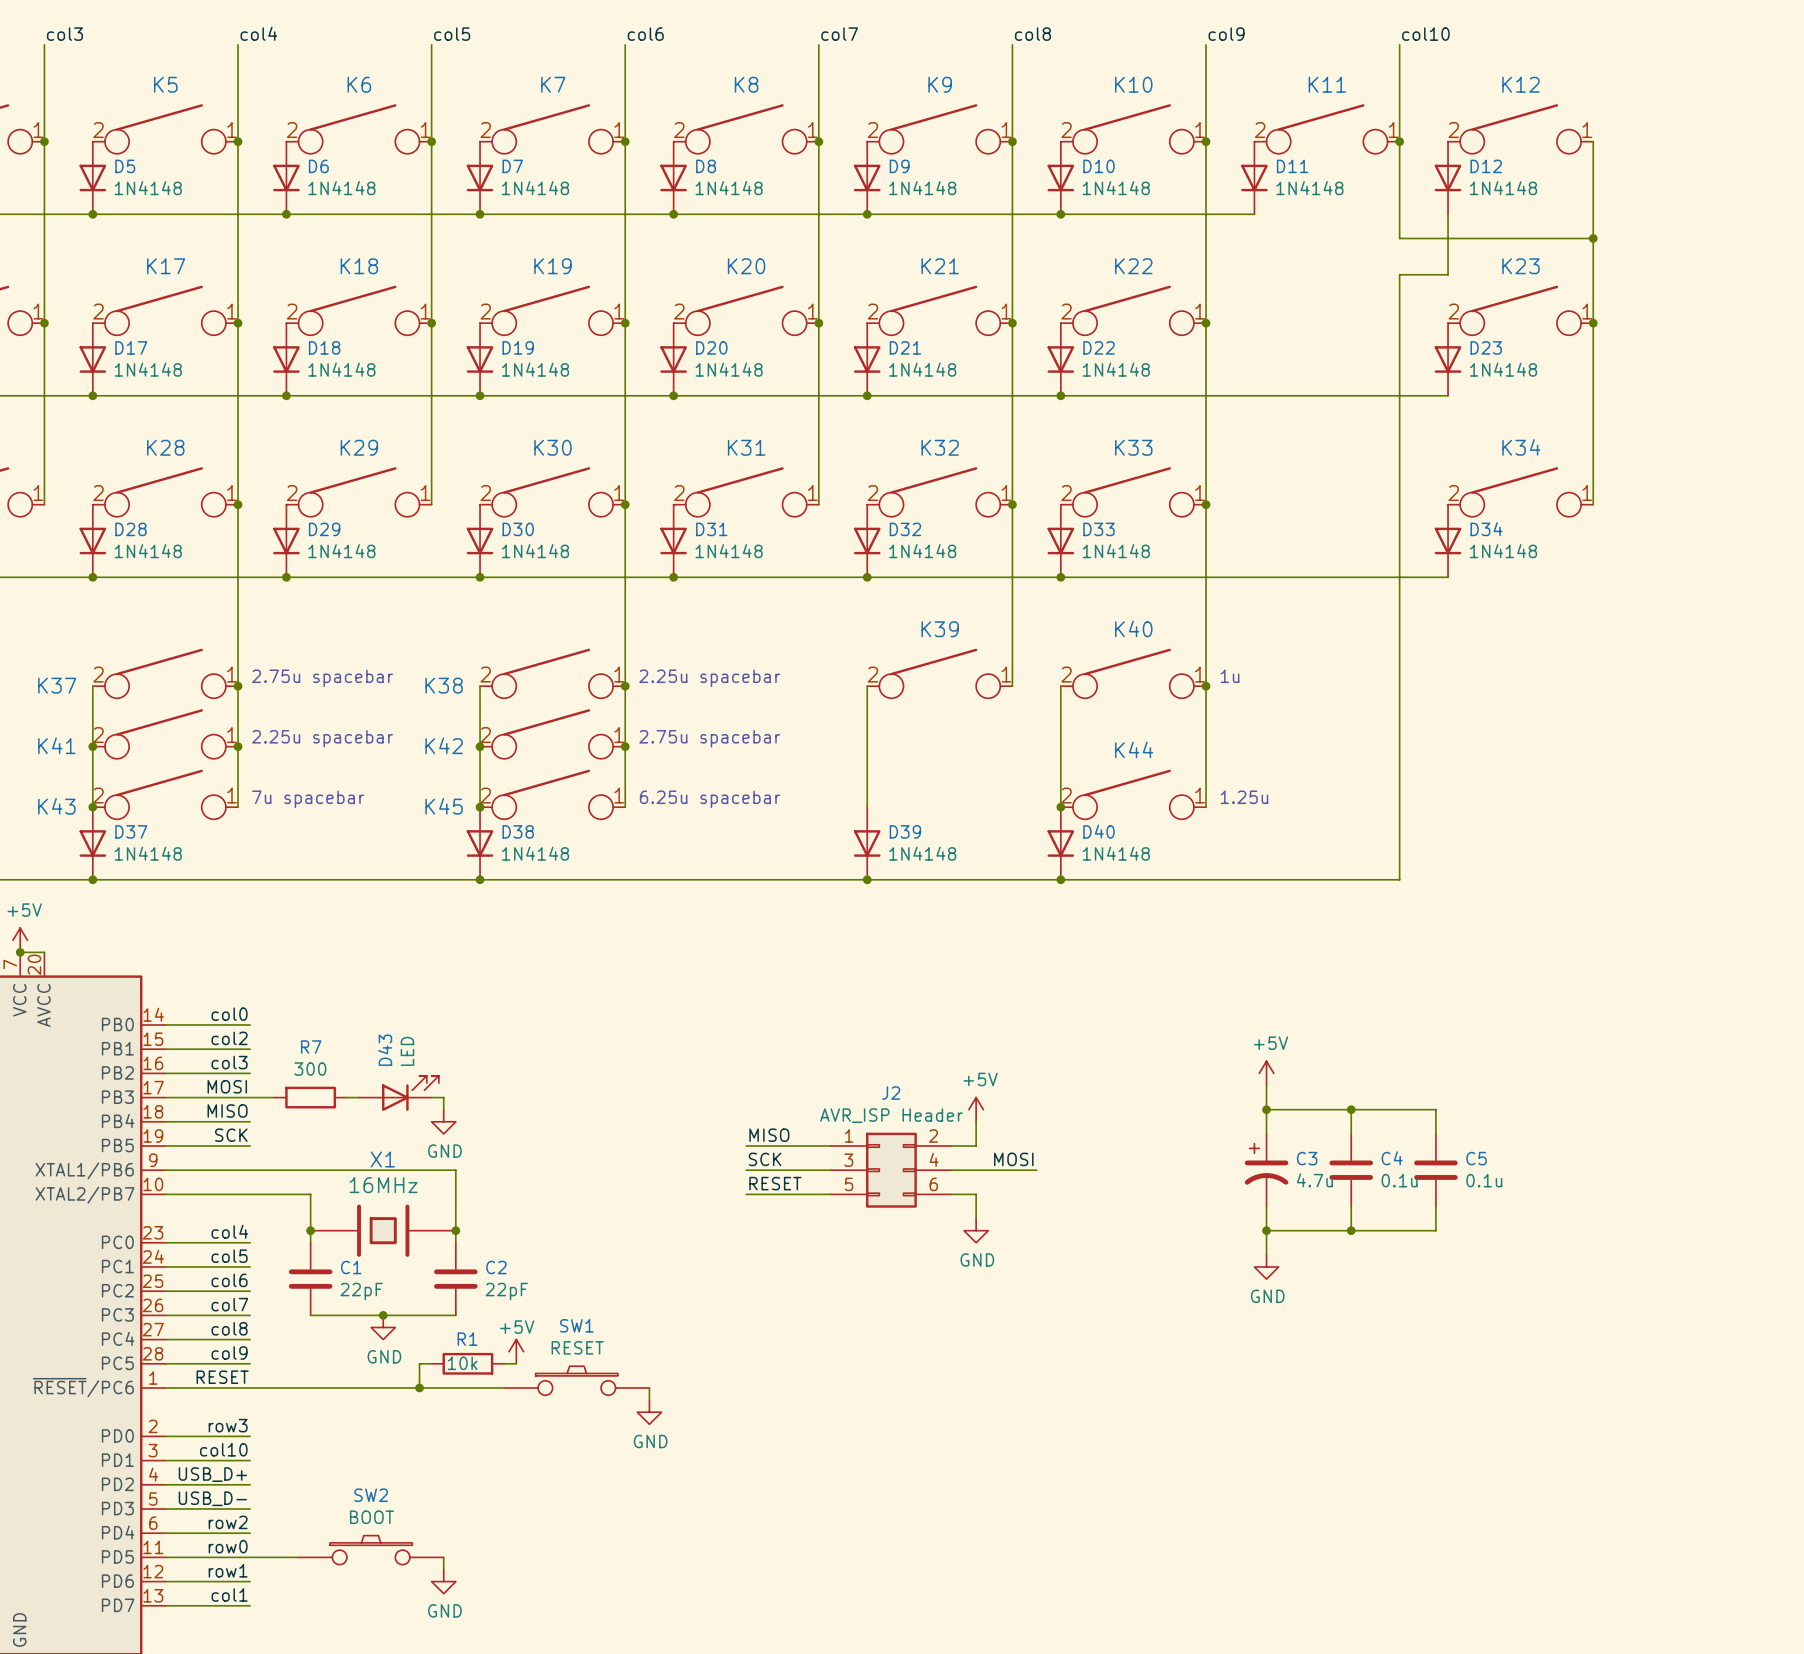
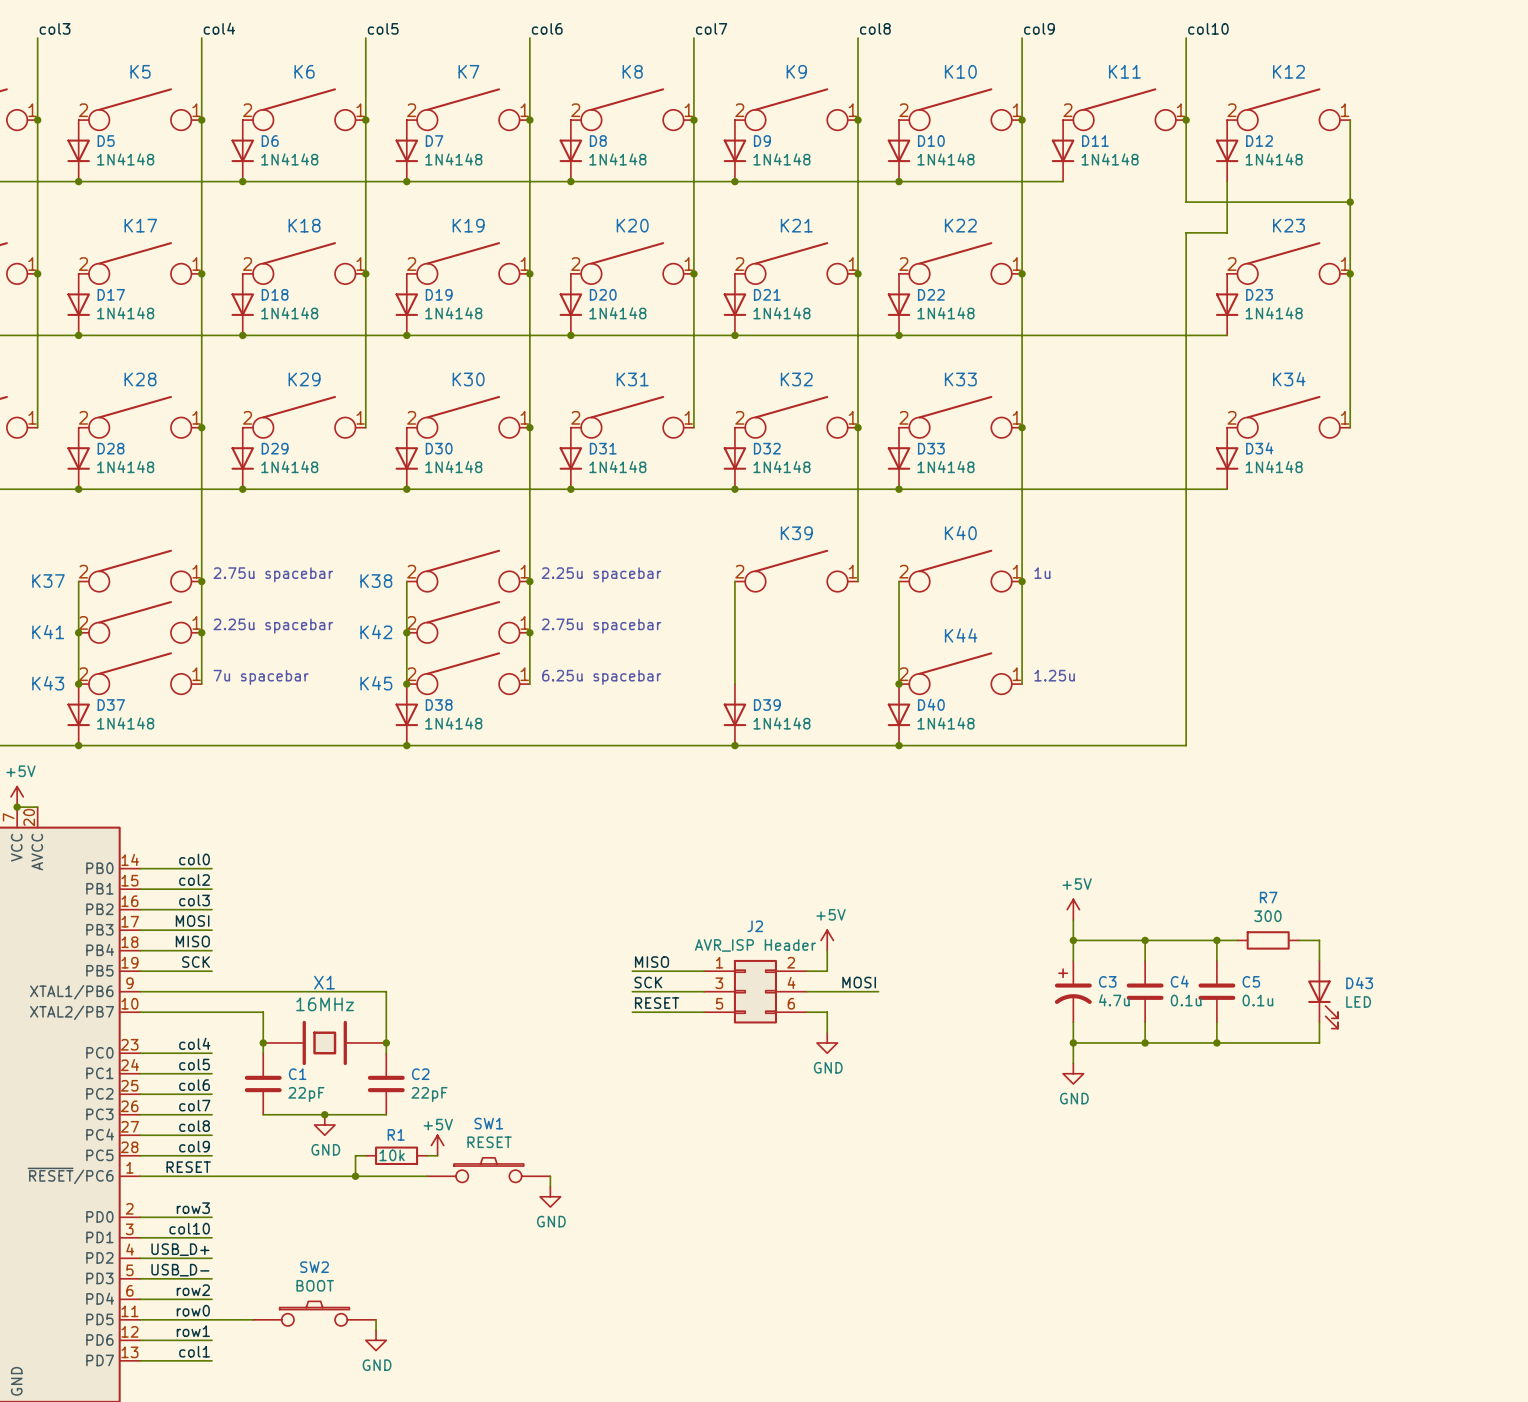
D43 position: (398, 1093) -> (1323, 994)
D43 rotation: 0° (410, 1093) -> 90° clockwise (1323, 1004)
wire: (250, 1097) (274, 1097) -> none
R7 position: (310, 1097) -> (1268, 940)
wire: (346, 1097) (359, 1097) -> none
wire: (431, 1097) (443, 1097) (443, 1109) -> none
wire: none -> (1216, 940) (1237, 940)
junction: none -> (1216, 940)
wire: none -> (1298, 940) (1319, 940) (1319, 960)
power symbol: GND (443, 1121) -> none
wire: none -> (1319, 1022) (1319, 1042) (1216, 1042)
junction: none -> (1216, 1042)

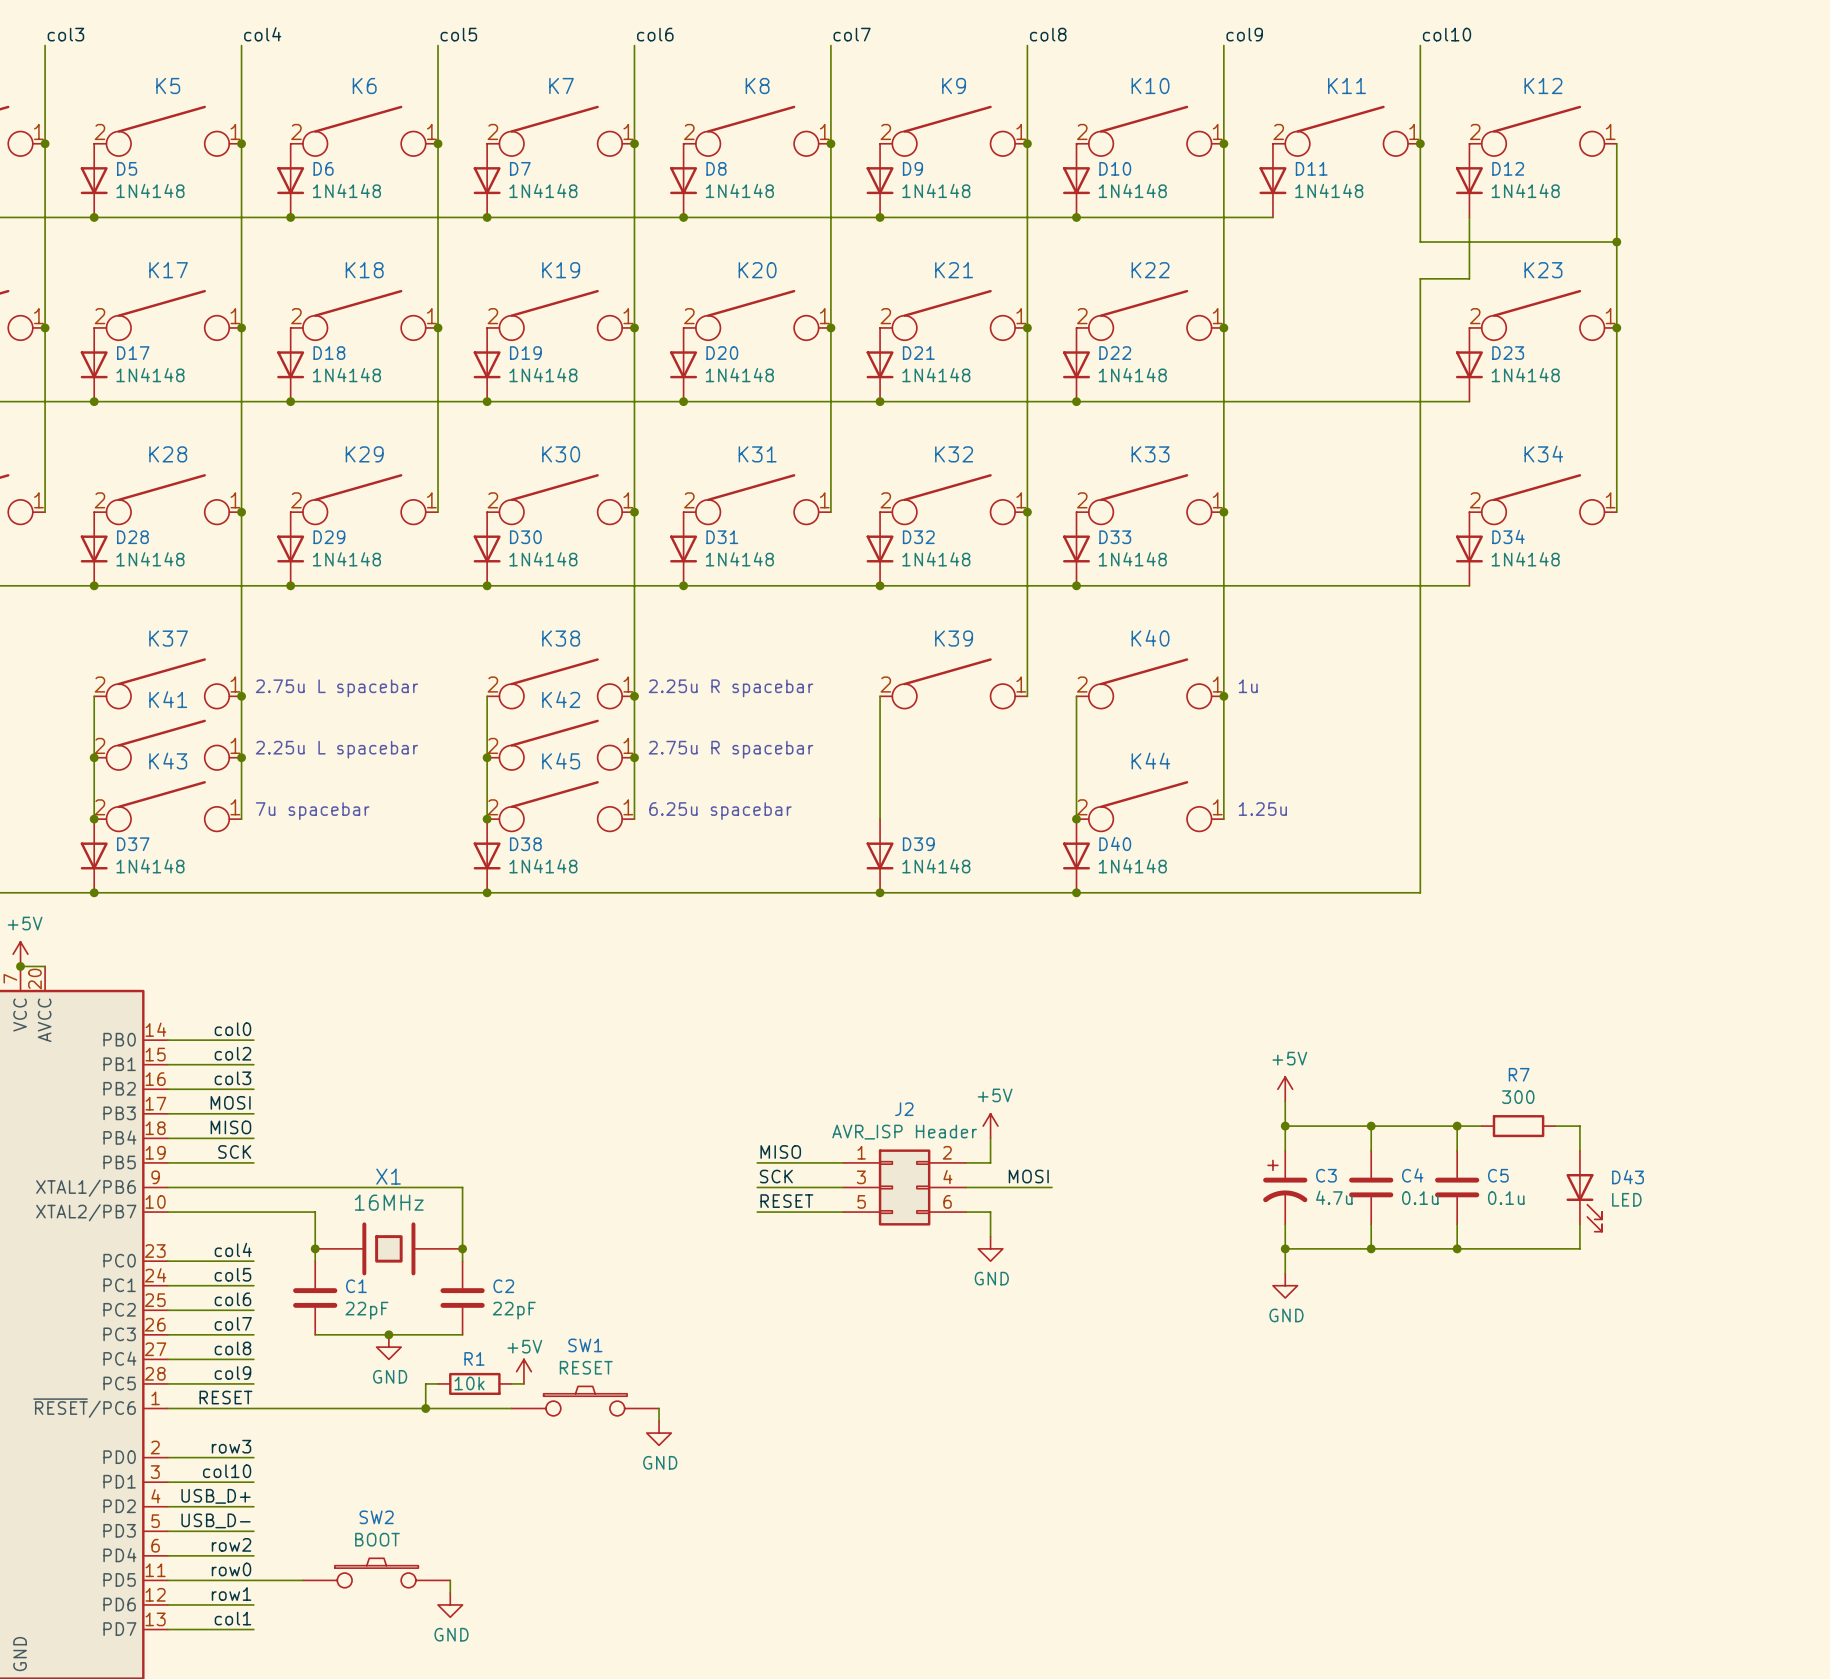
text: 2.75u spacebar (273, 574) -> 2.75u L spacebar (336, 688)
text: 2.25u spacebar (601, 574) -> 2.25u R spacebar (731, 688)
K37 name position: K37 (48, 581) -> K37 (168, 638)
K38 name position: K38 (376, 581) -> K38 (561, 638)
text: 2.25u spacebar (273, 626) -> 2.25u L spacebar (336, 749)
text: 2.75u spacebar (601, 626) -> 2.75u R spacebar (731, 749)
K41 name position: K41 (48, 632) -> K41 (168, 699)
K42 name position: K42 (376, 632) -> K42 (561, 699)
K43 name position: K43 (48, 683) -> K43 (168, 761)
K45 name position: K45 (376, 683) -> K45 (561, 761)

